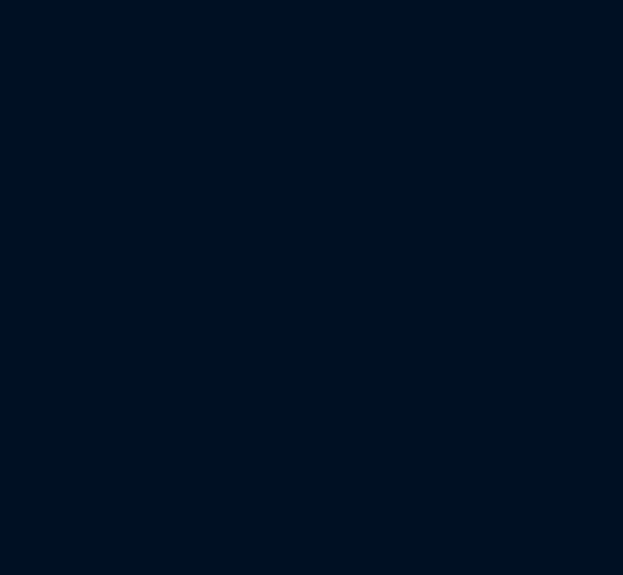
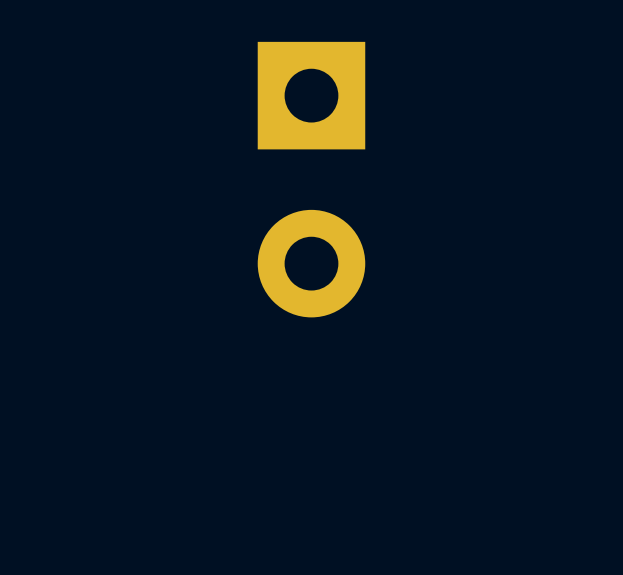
part: none -> (311, 179)

